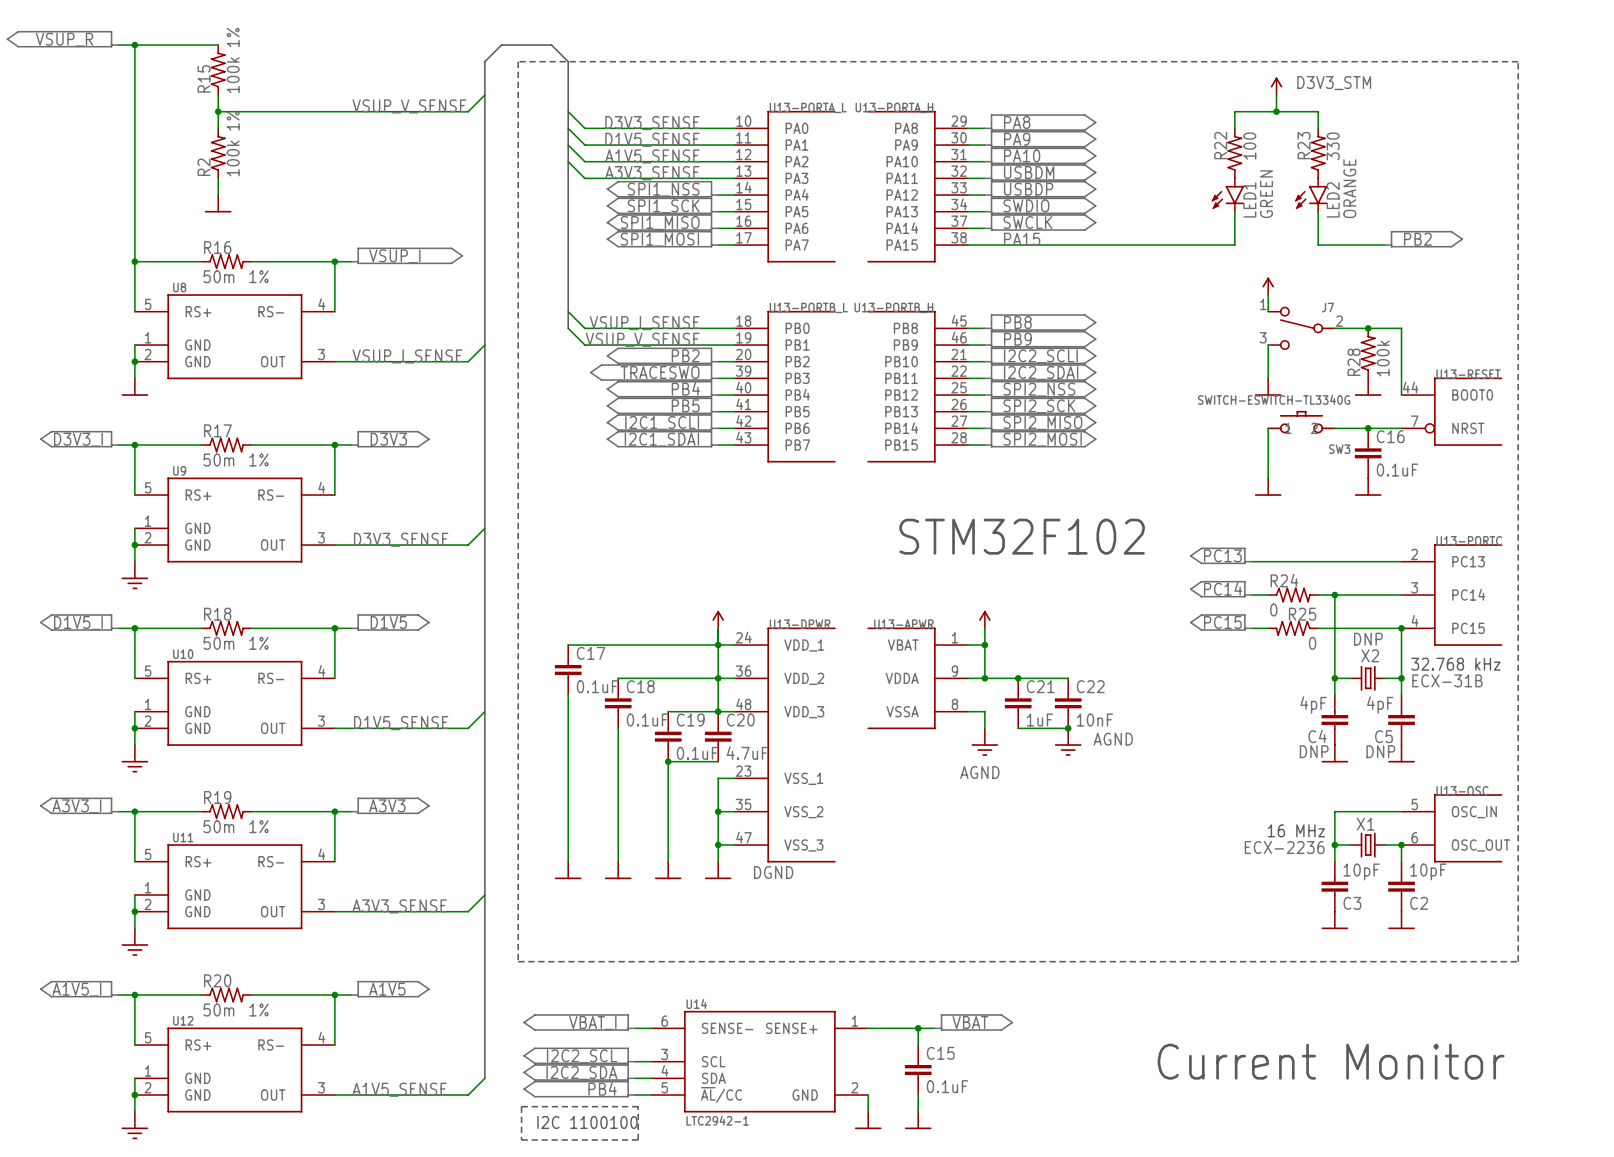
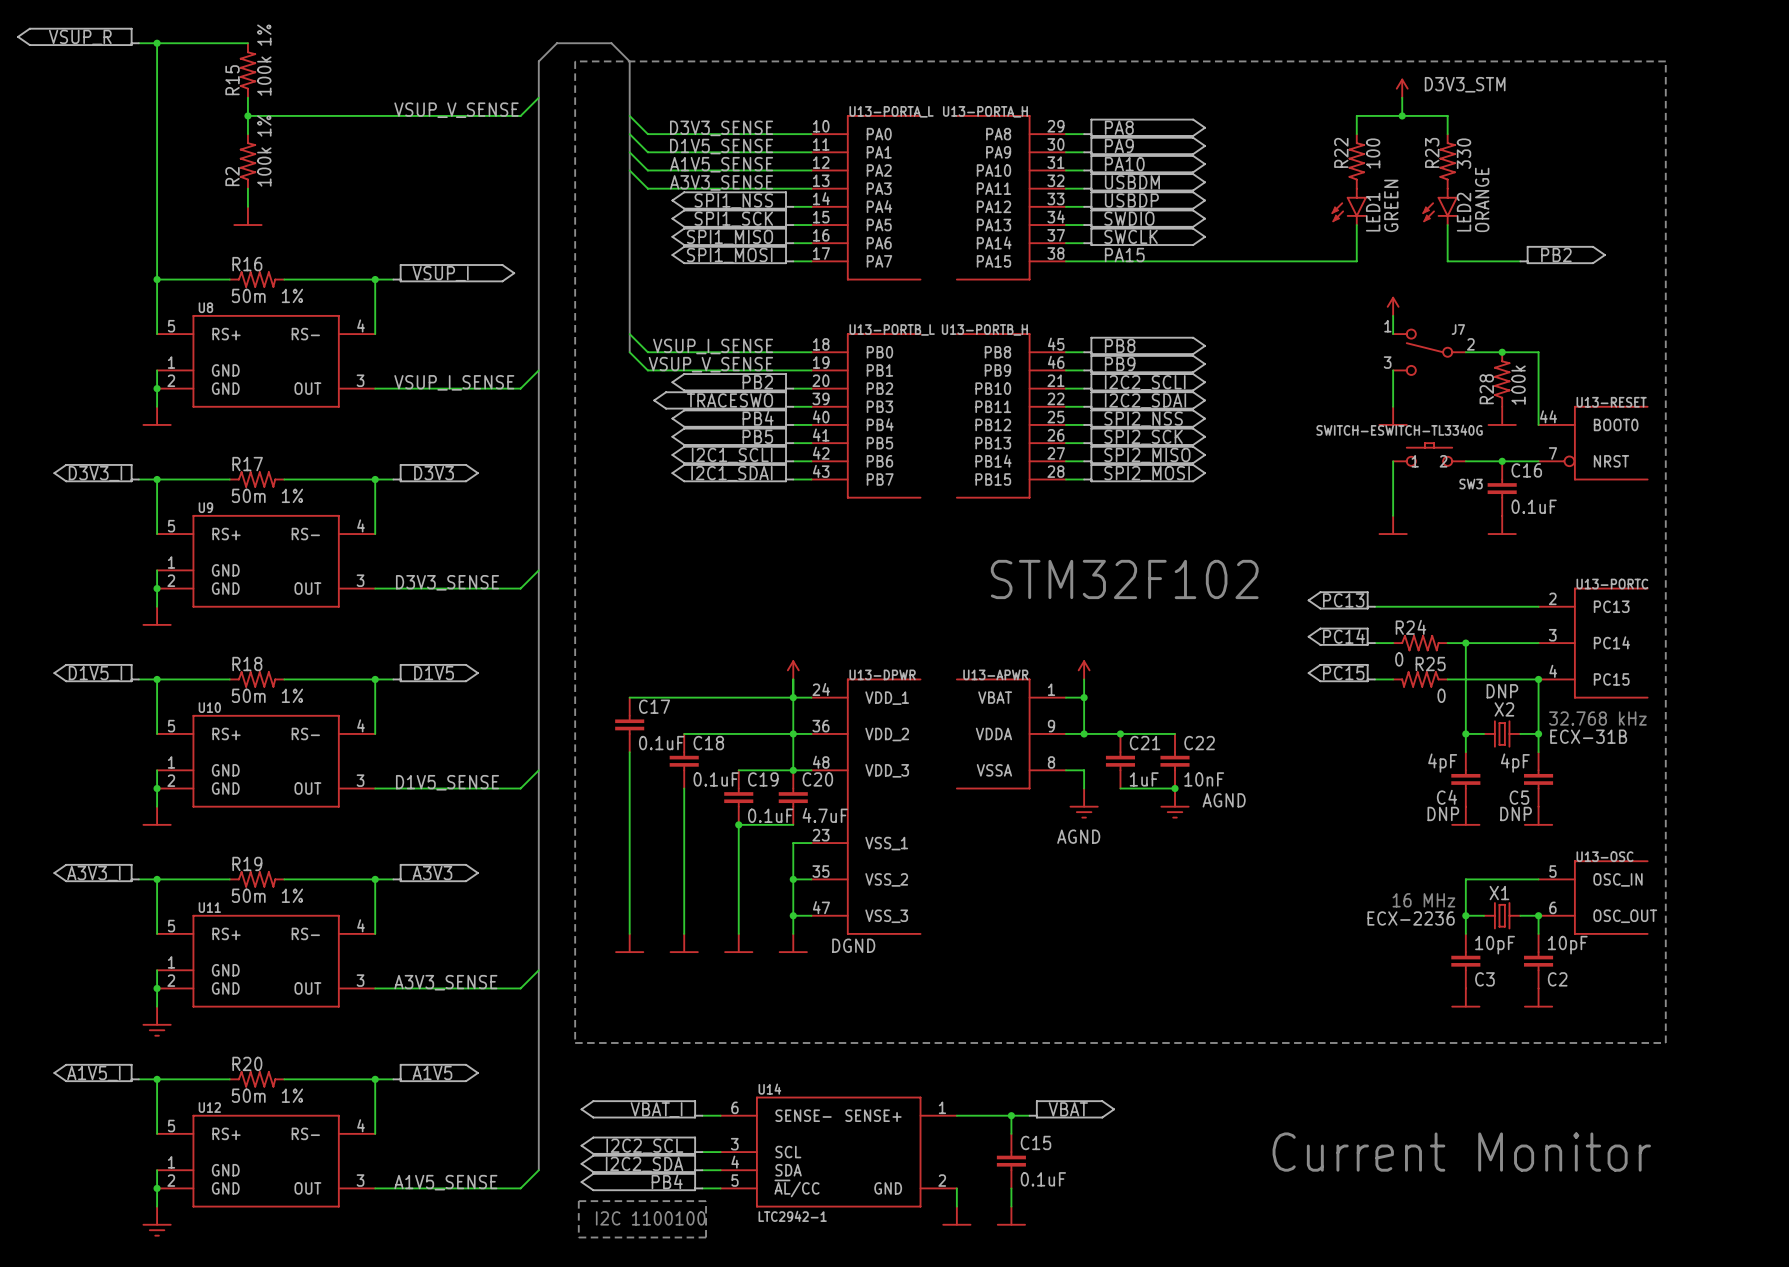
power symbol shape: [121, 561, 149, 590] -> [142, 606, 172, 626]
power symbol shape: [121, 745, 149, 773] -> [142, 806, 172, 826]

